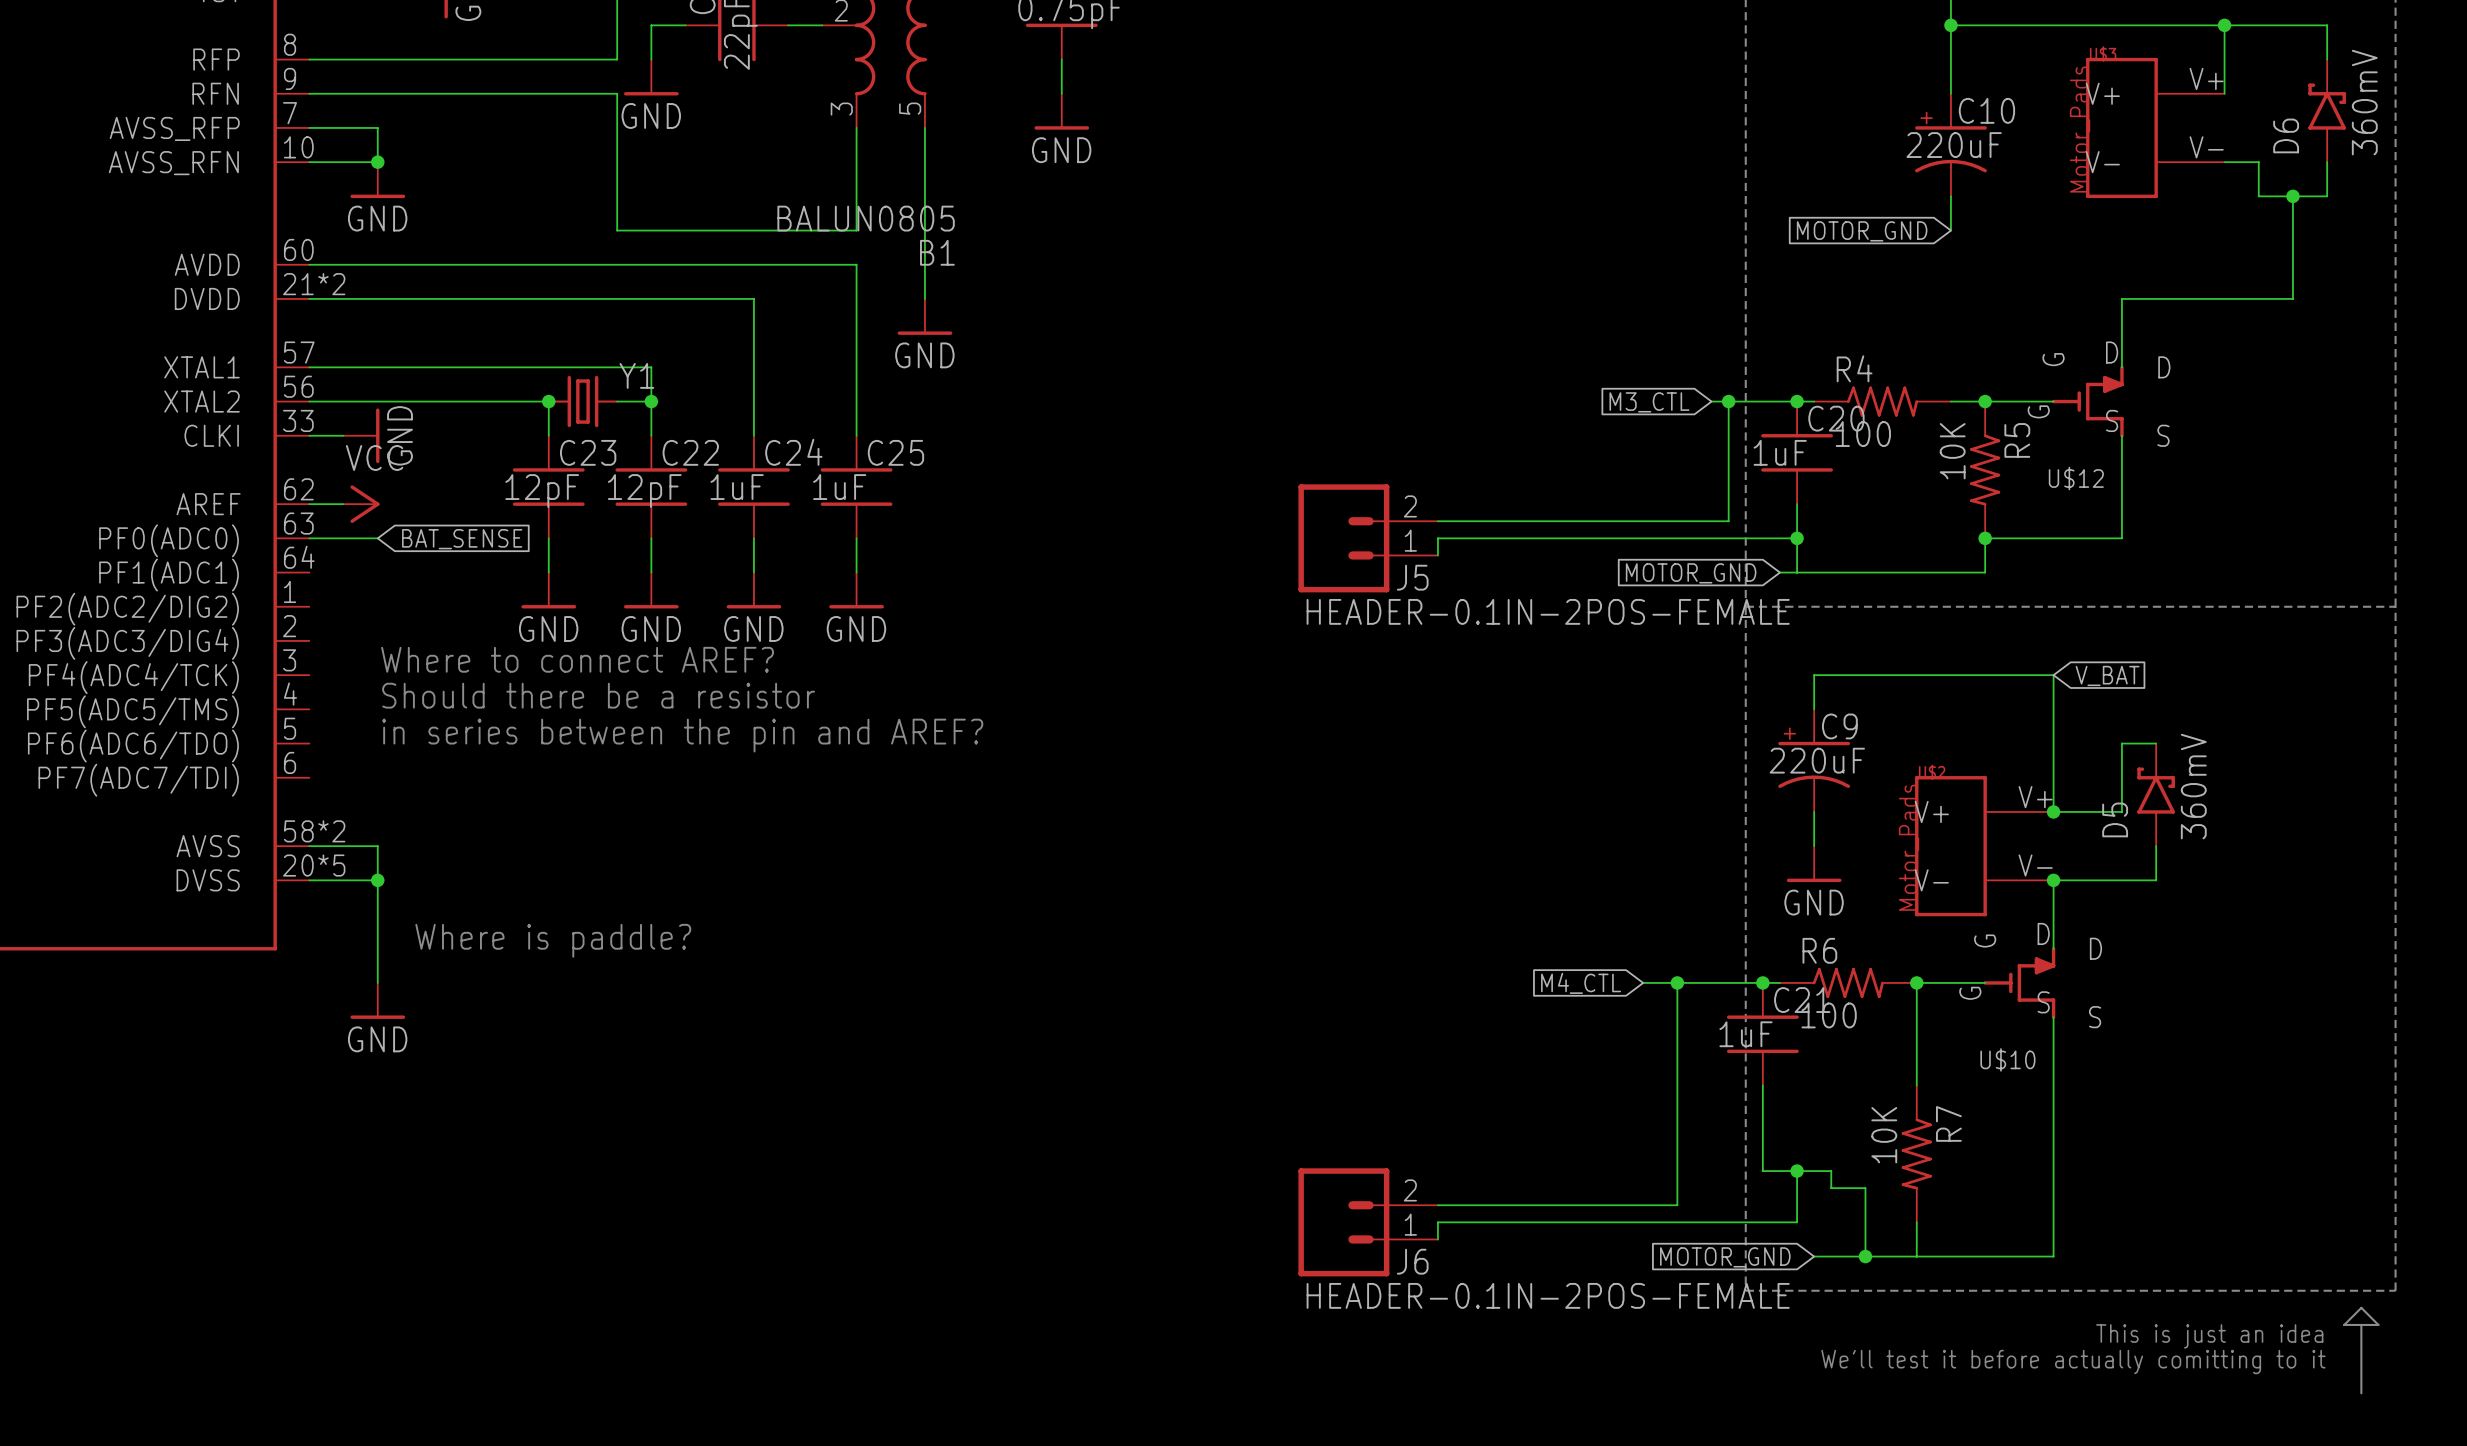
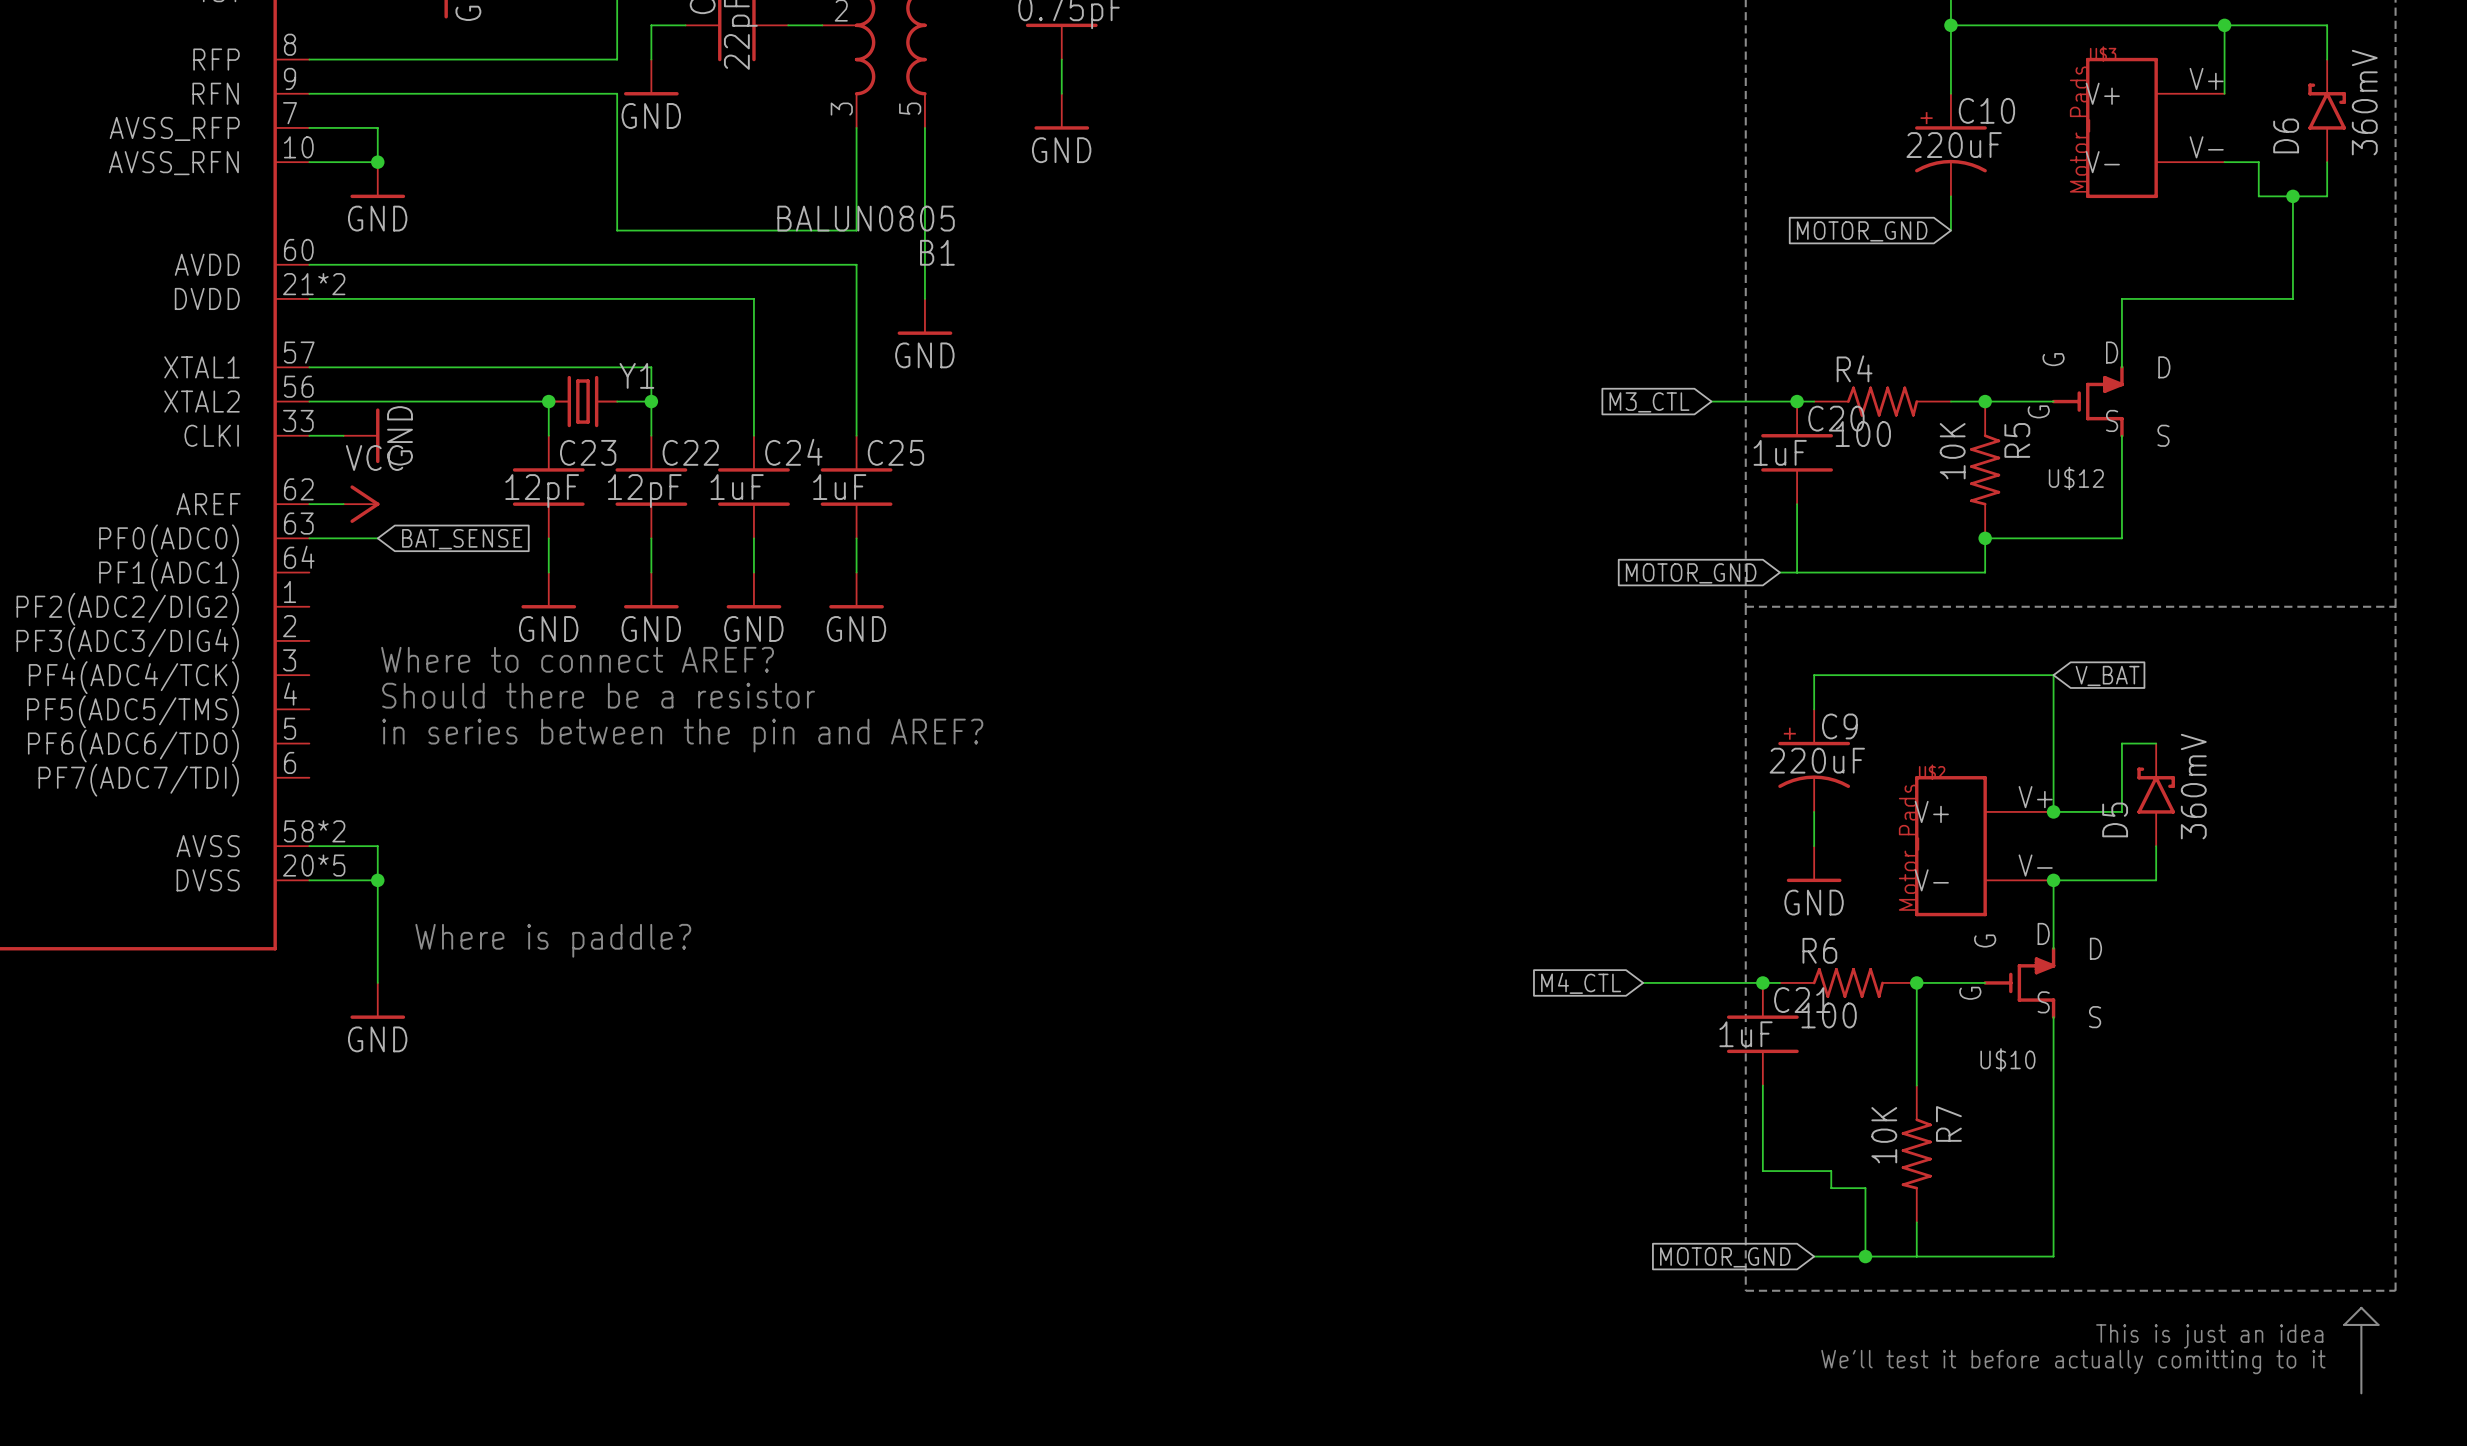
wire: (1728, 401) (1728, 521) (1437, 521) -> none
junction: (1728, 401) -> none
J5: HEADER-0.1IN-2POS-FEMALE (1368, 538) -> none
wire: (1797, 538) (1437, 538) (1437, 555) -> none
junction: (1797, 538) -> none
wire: (1677, 982) (1677, 1205) (1437, 1205) -> none
junction: (1677, 982) -> none
wire: (1797, 1171) (1797, 1222) (1437, 1222) (1437, 1239) -> none
junction: (1797, 1171) -> none
J6: HEADER-0.1IN-2POS-FEMALE (1368, 1222) -> none

